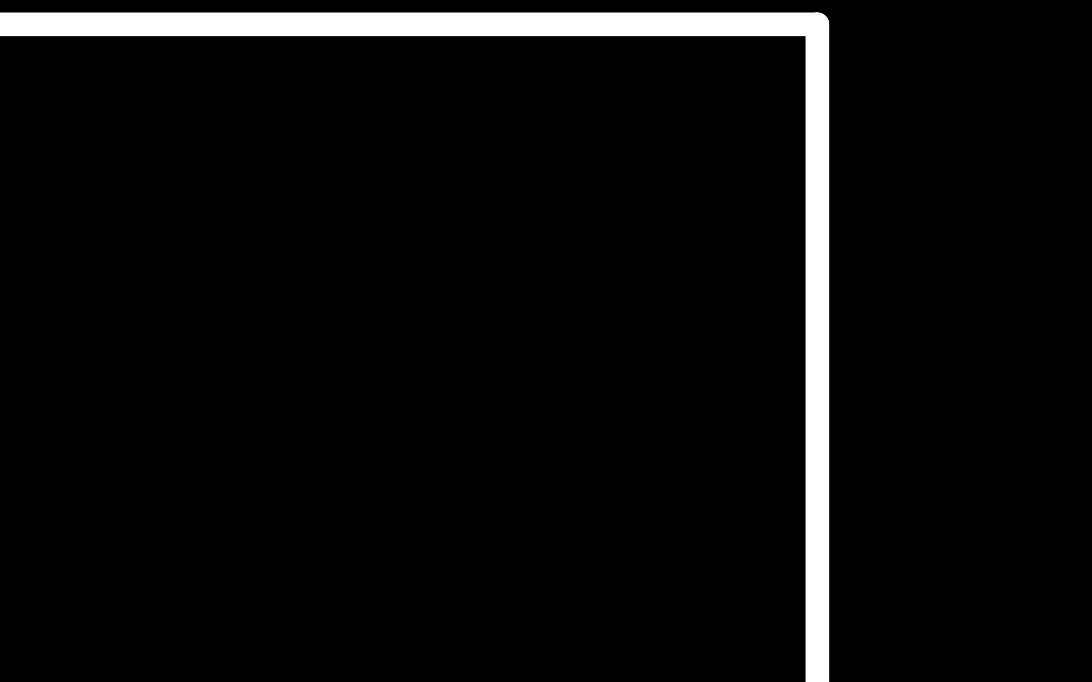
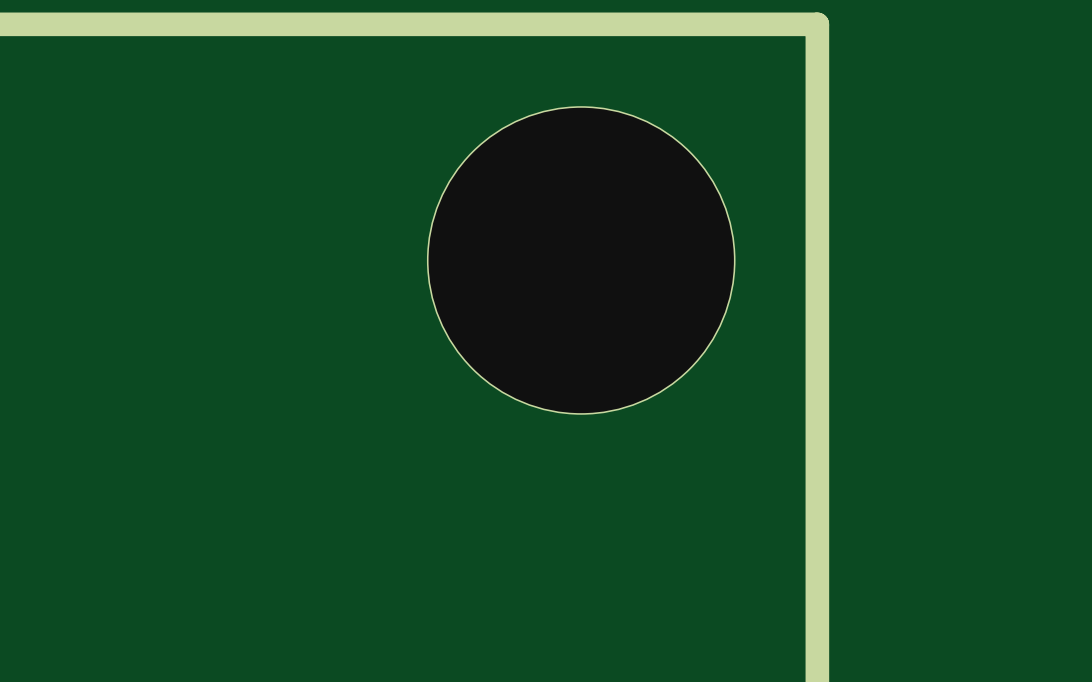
part: none -> (581, 260)

